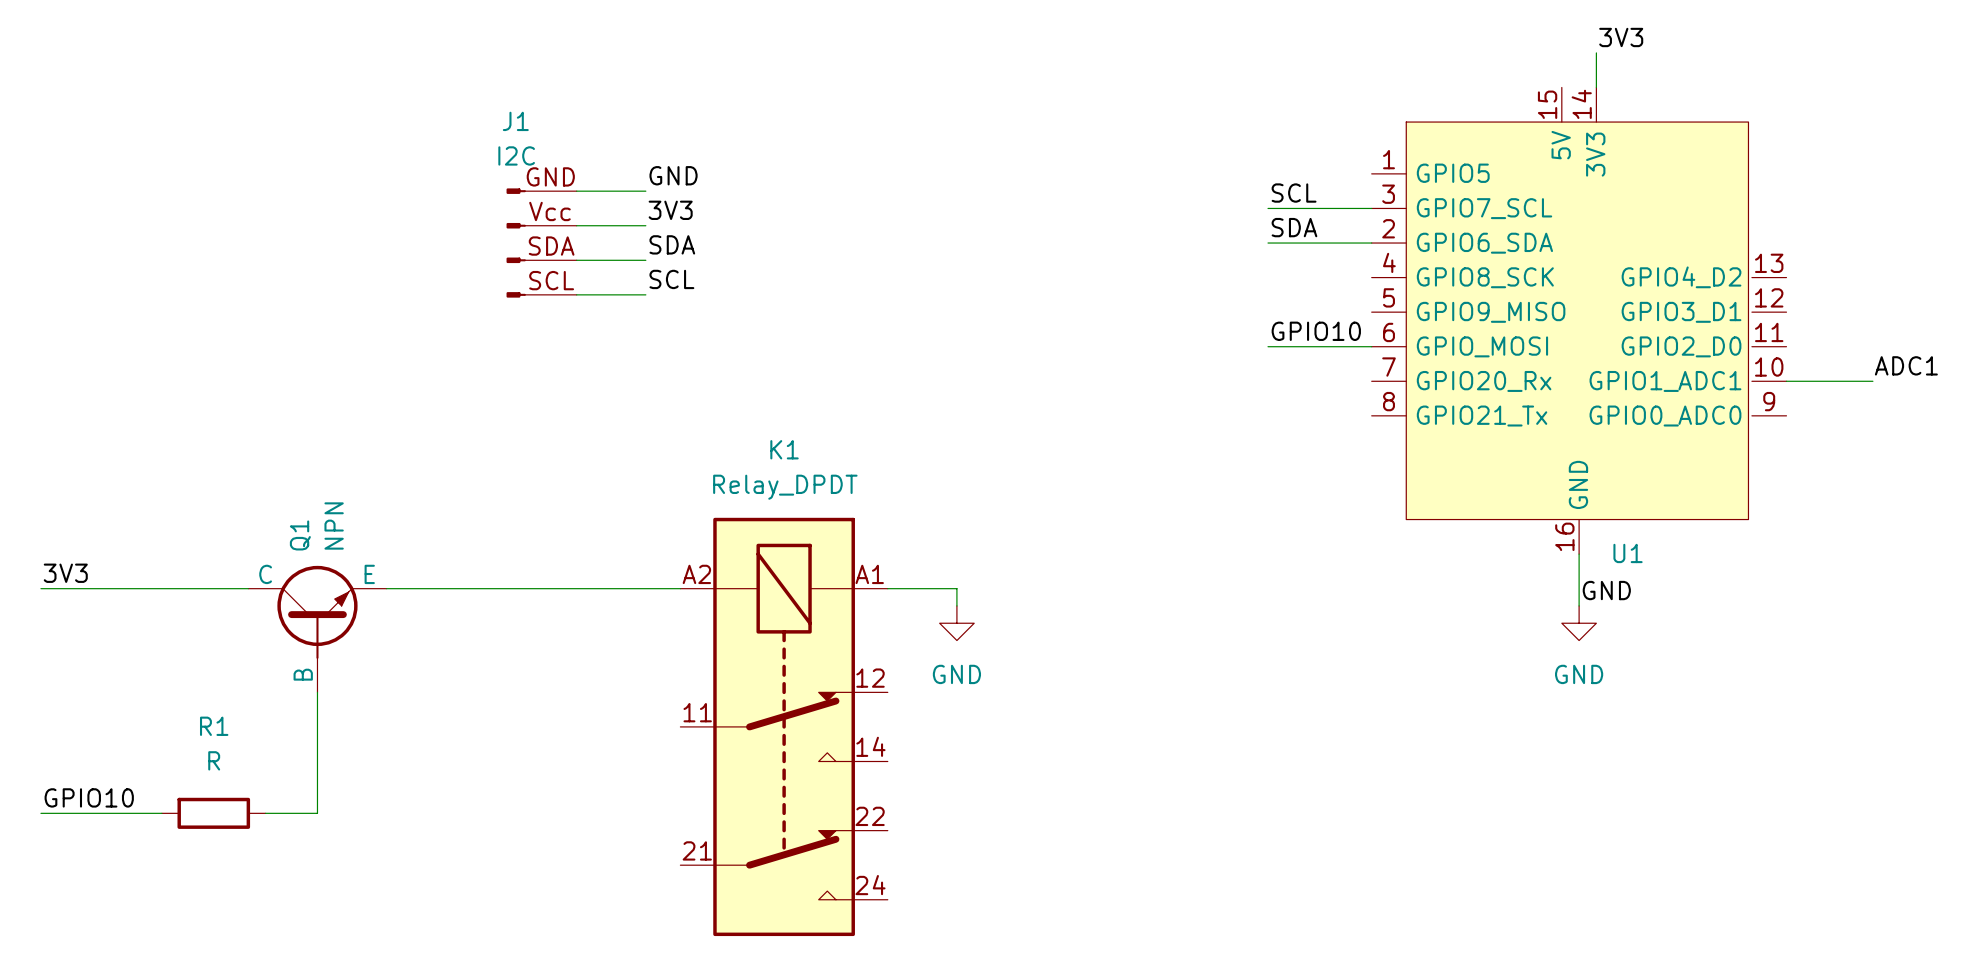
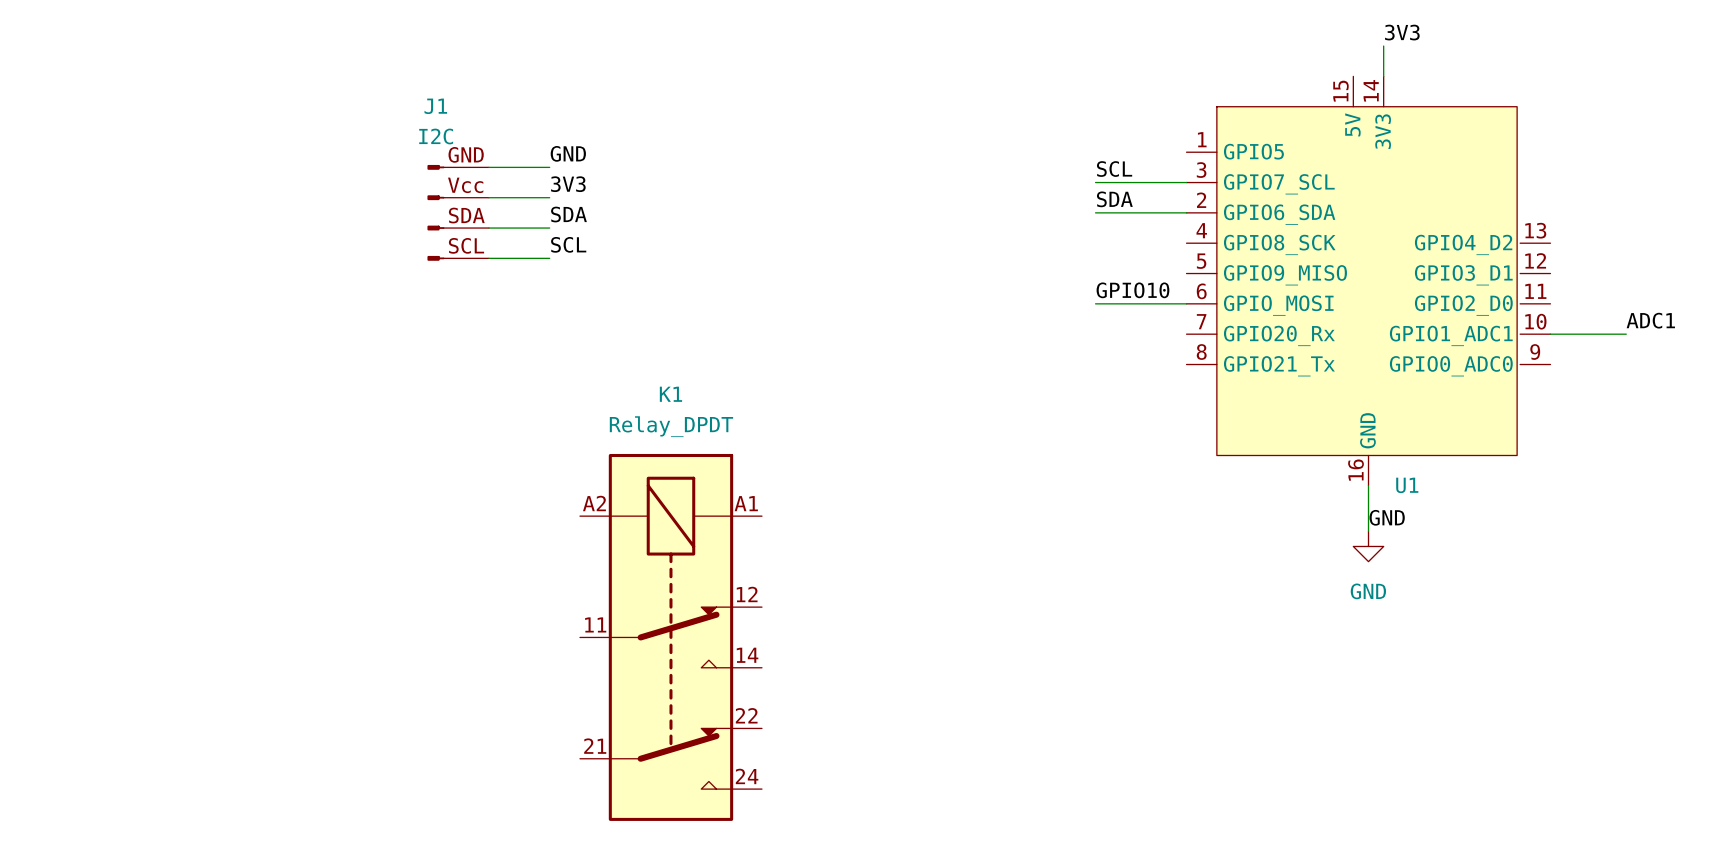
label: 3V3 (65, 573) -> none
wire: (40, 588) (248, 588) -> none
wire: (386, 588) (680, 588) -> none
wire: (887, 588) (956, 588) (956, 605) -> none
power symbol: GND (956, 623) -> none
Q1: NPN (317, 629) -> none
wire: (317, 692) (317, 813) (265, 813) -> none
label: GPIO10 (89, 797) -> none
wire: (40, 813) (161, 813) -> none
R1: R (213, 813) -> none

